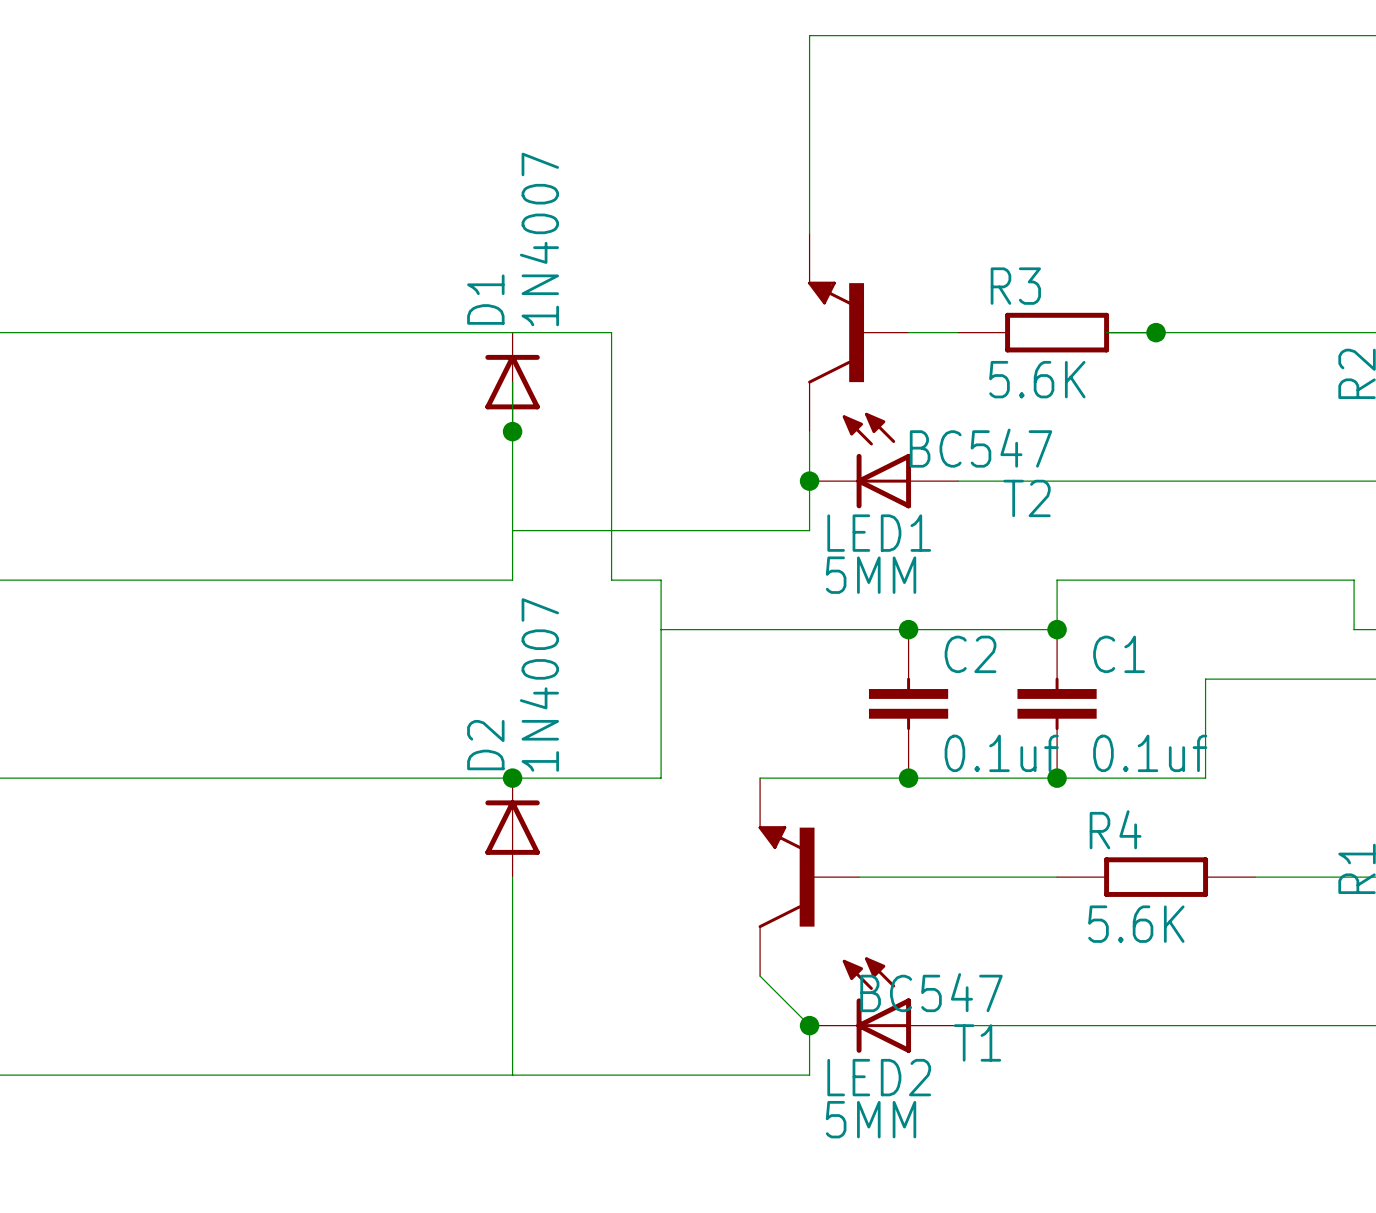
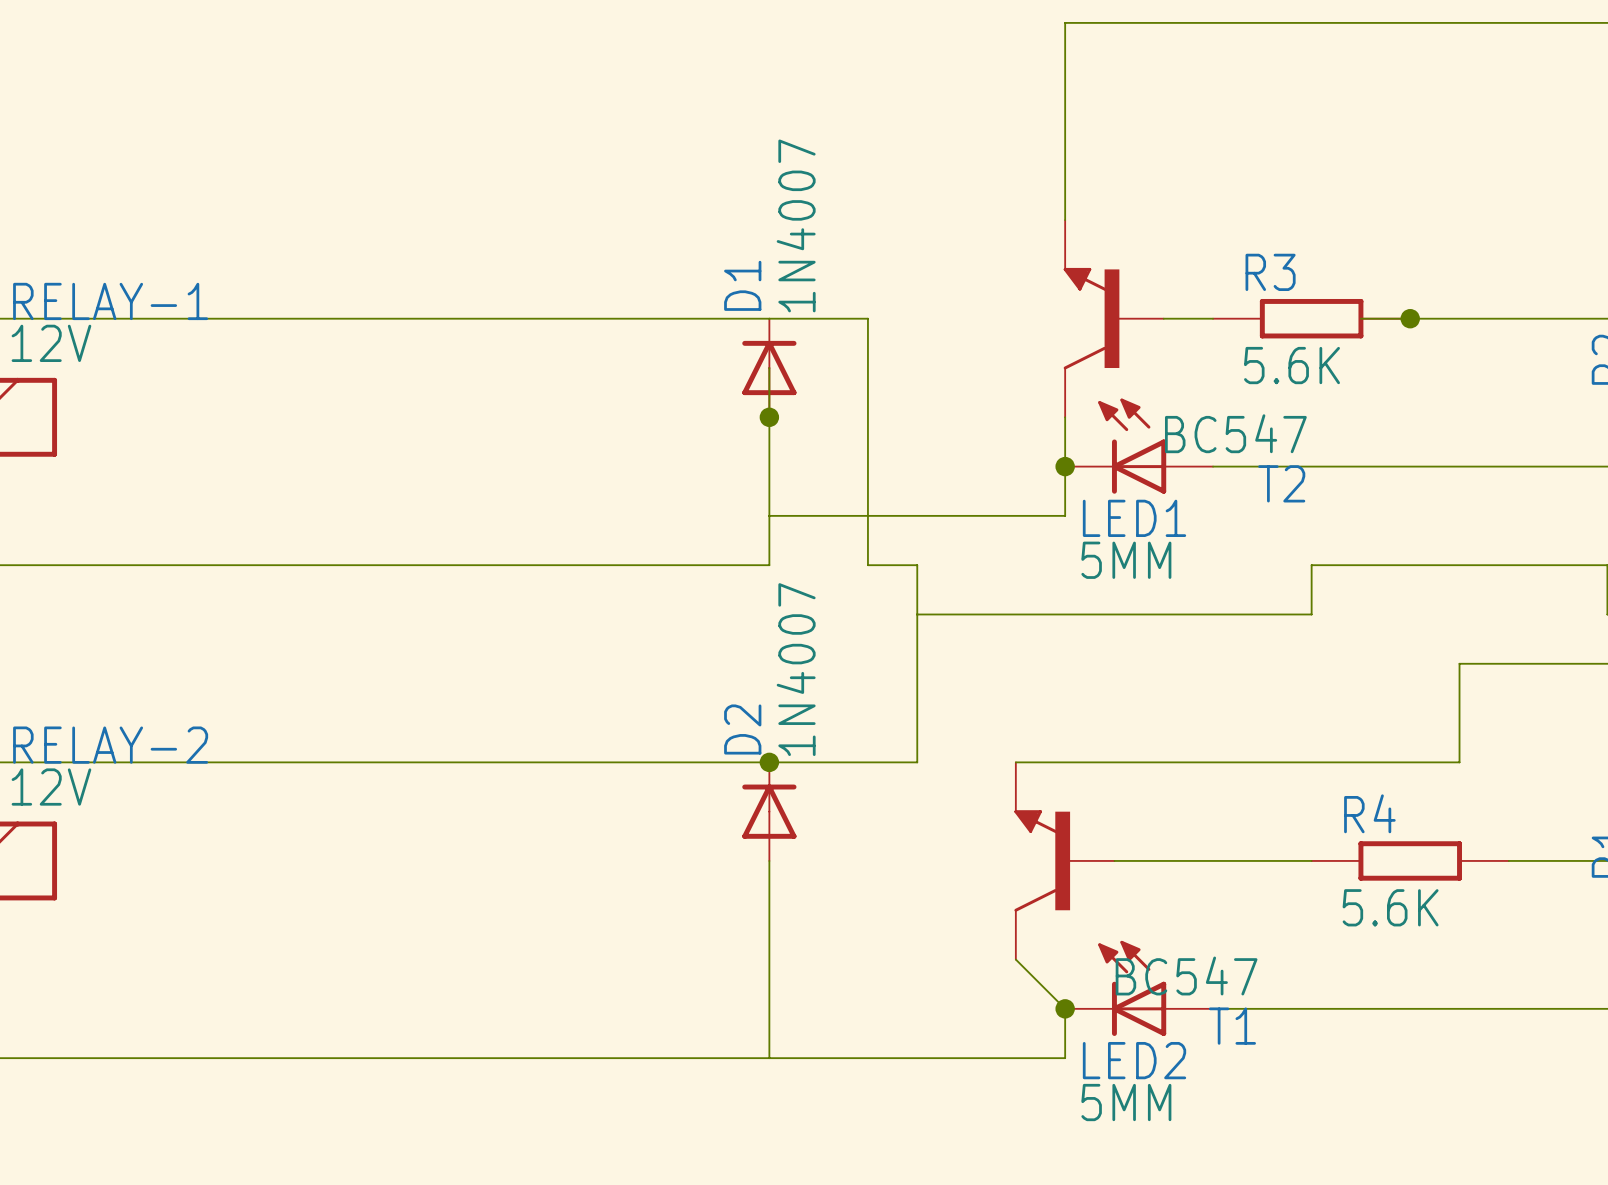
junction: (908, 629) -> none
junction: (1057, 629) -> none
C2: 0.1uf (908, 703) -> none
C1: 0.1uf (1057, 703) -> none
junction: (908, 778) -> none
junction: (1057, 778) -> none

